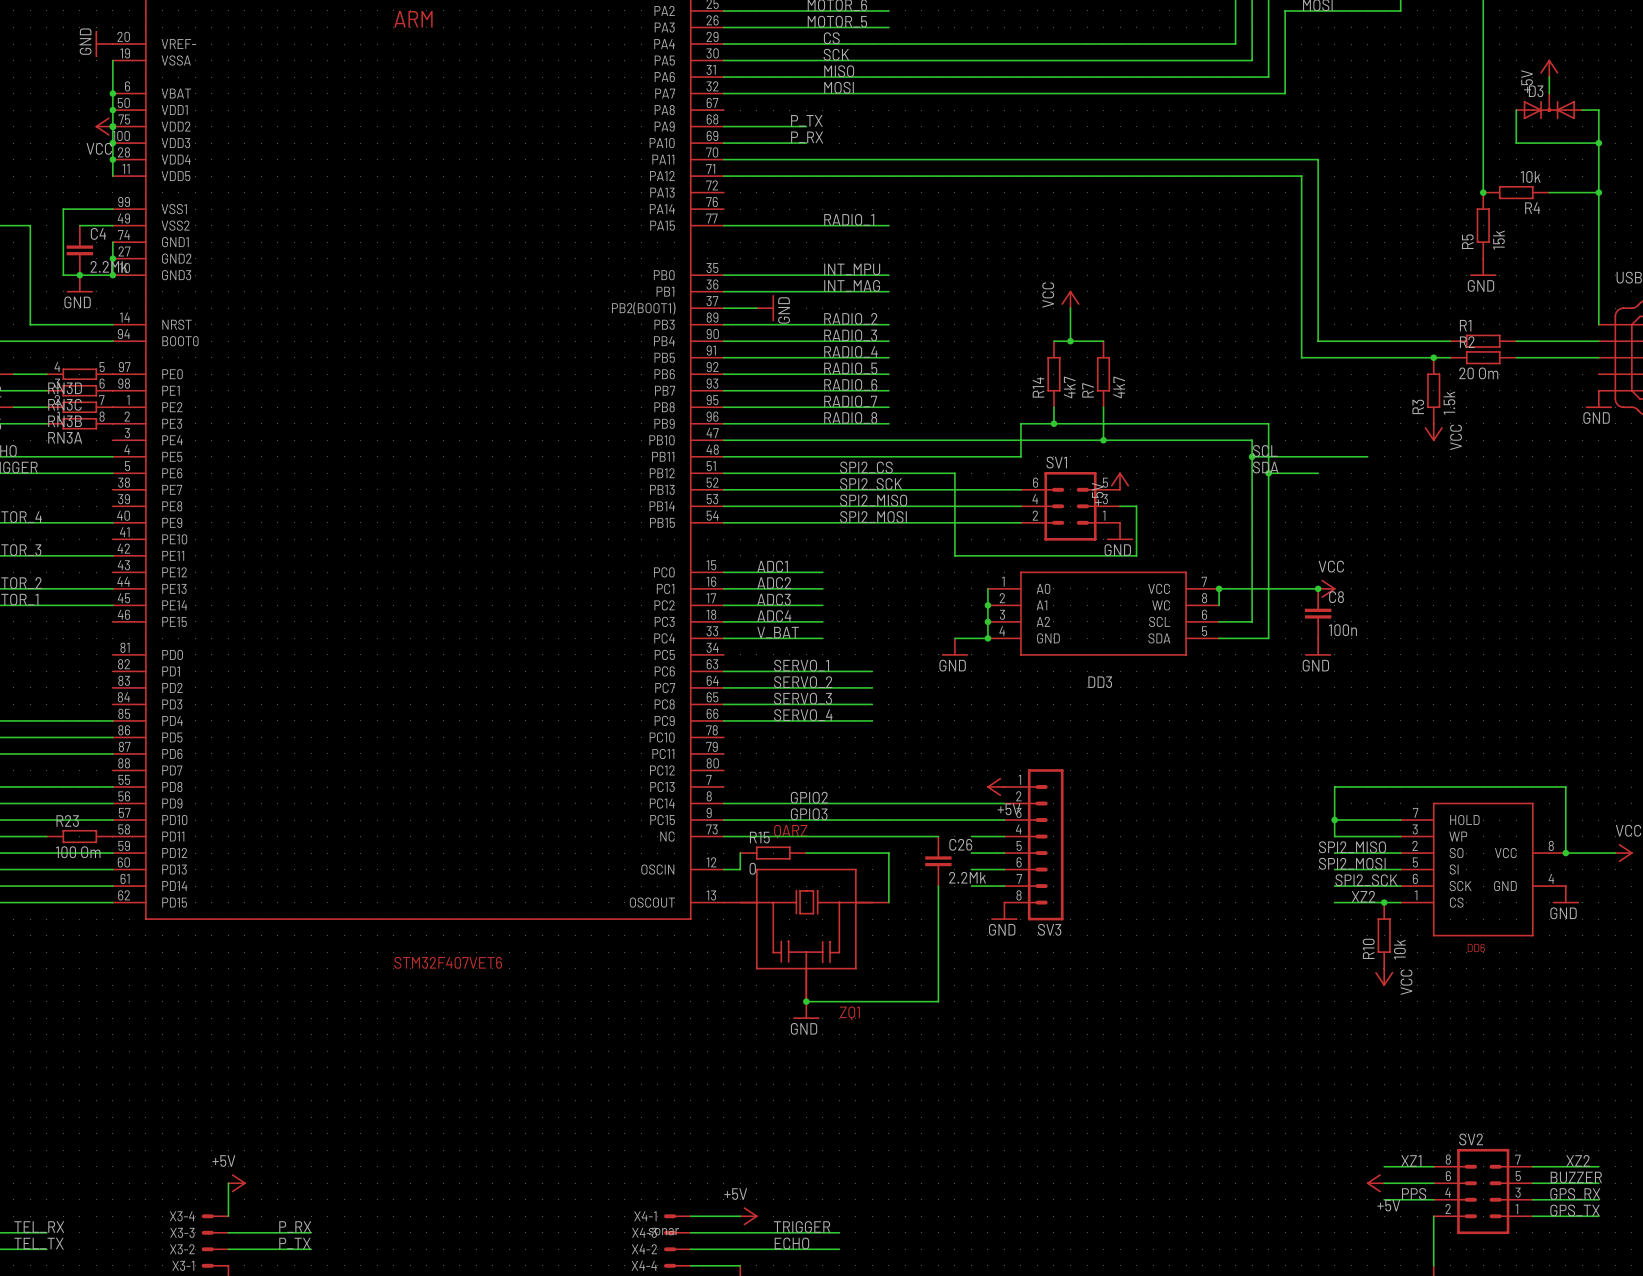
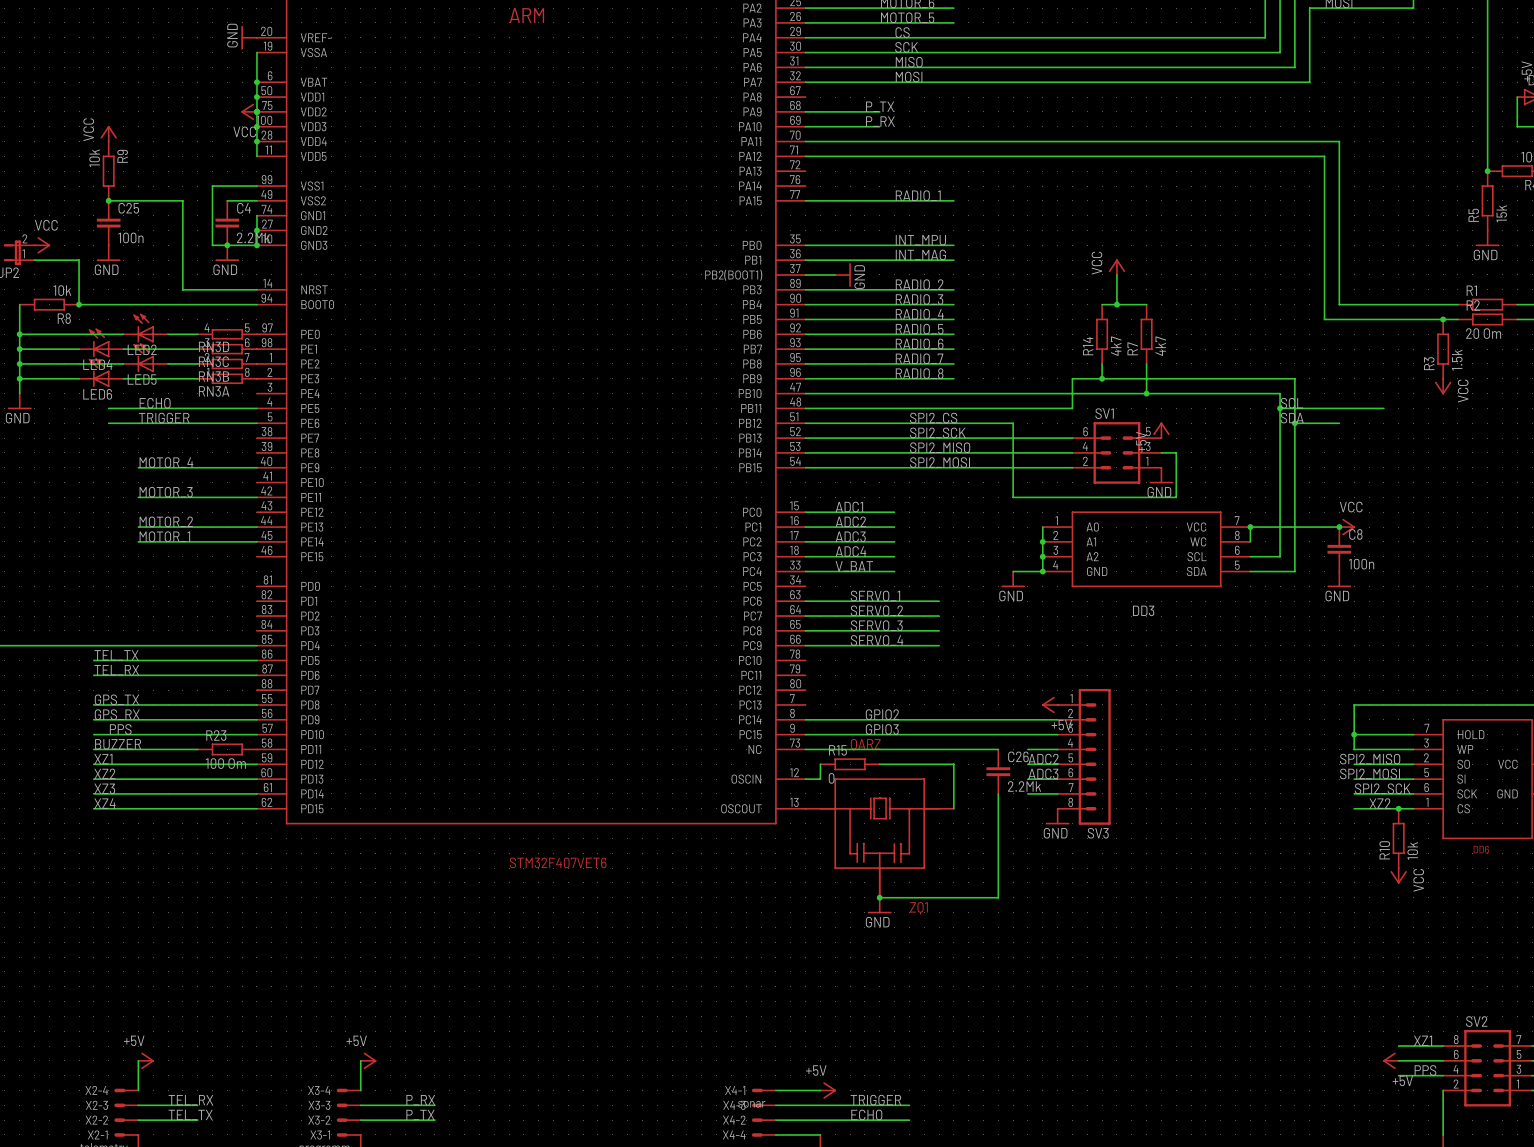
label: none -> ADC2 (1043, 759)
label: none -> ADC3 (1043, 773)

